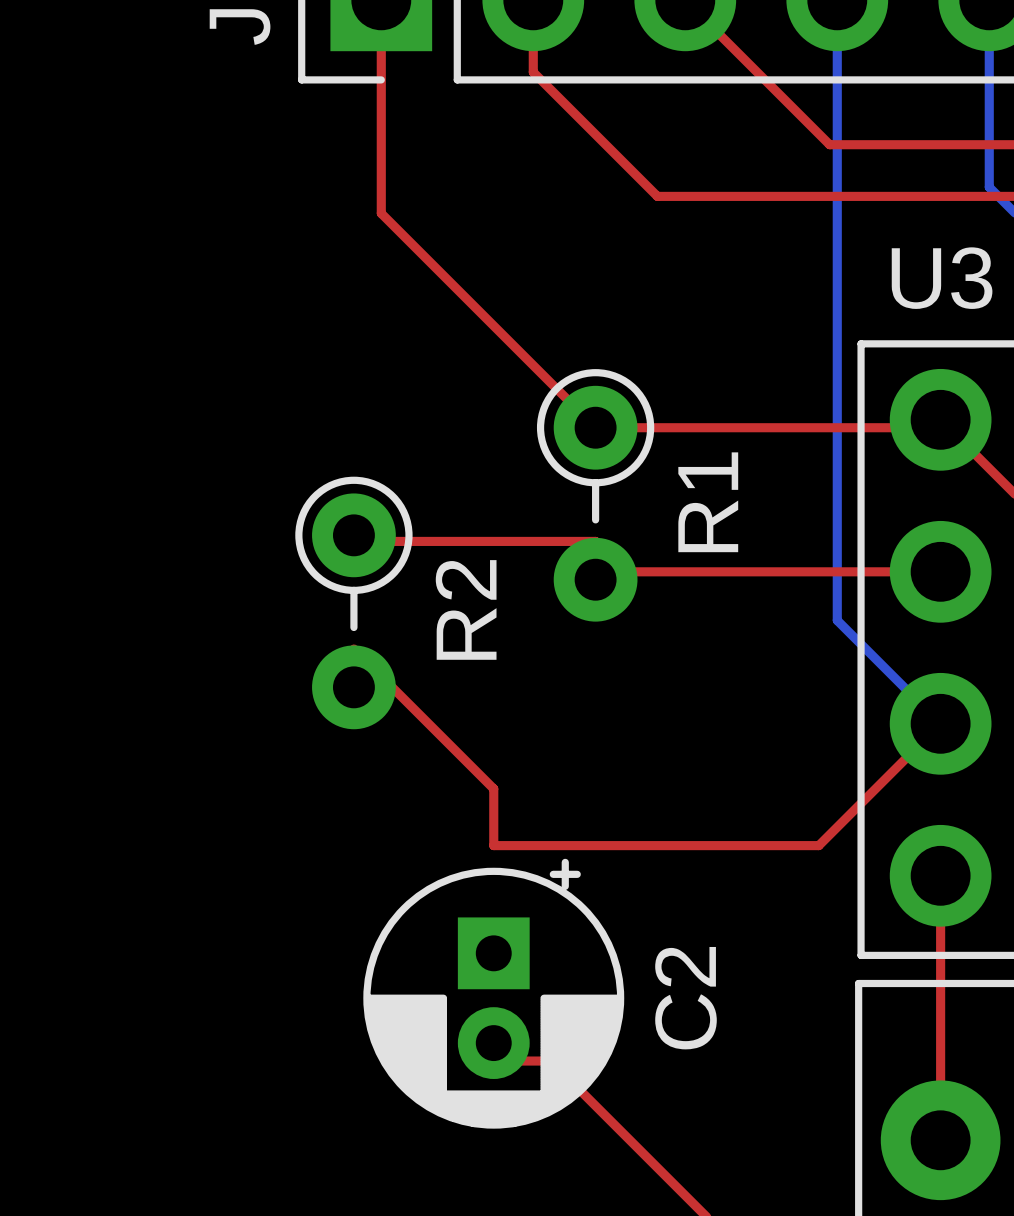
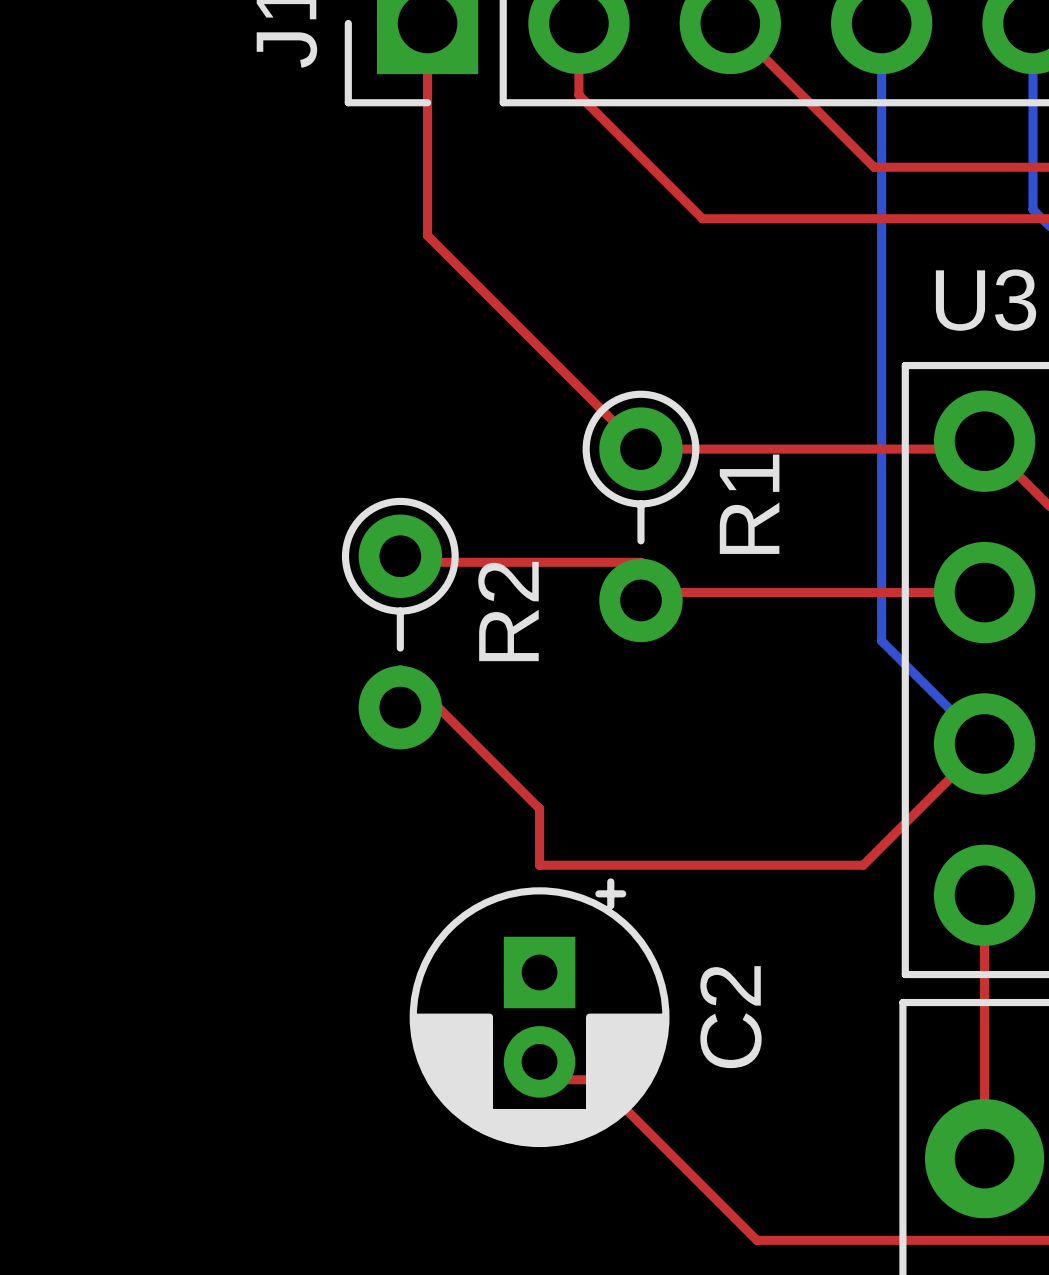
R1 name position: R1 (708, 502) -> R1 (749, 504)
R2 name position: R2 (466, 609) -> R2 (508, 611)

